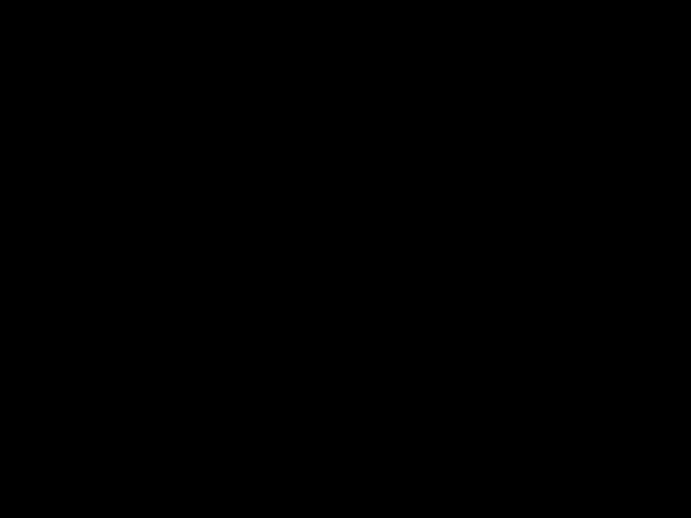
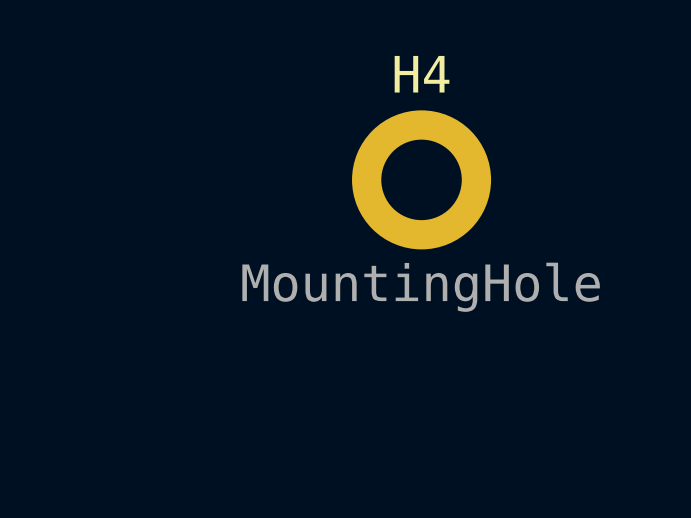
H4: none -> MountingHole (421, 179)

